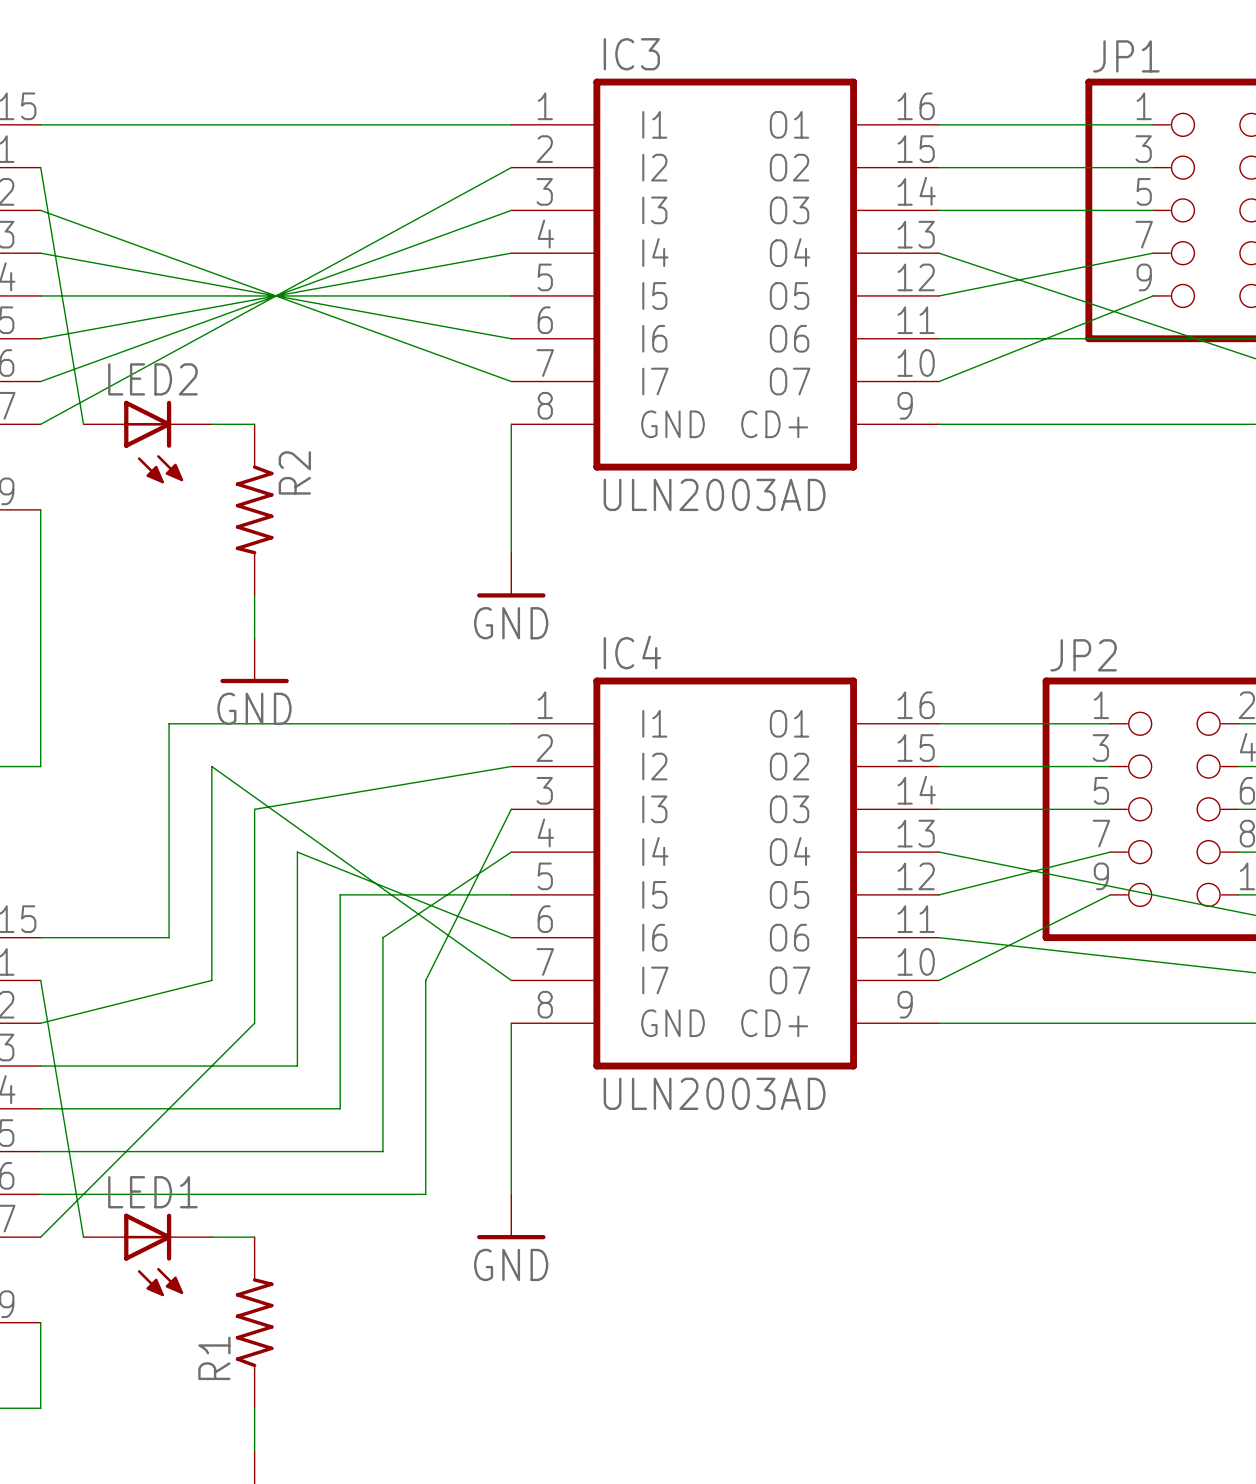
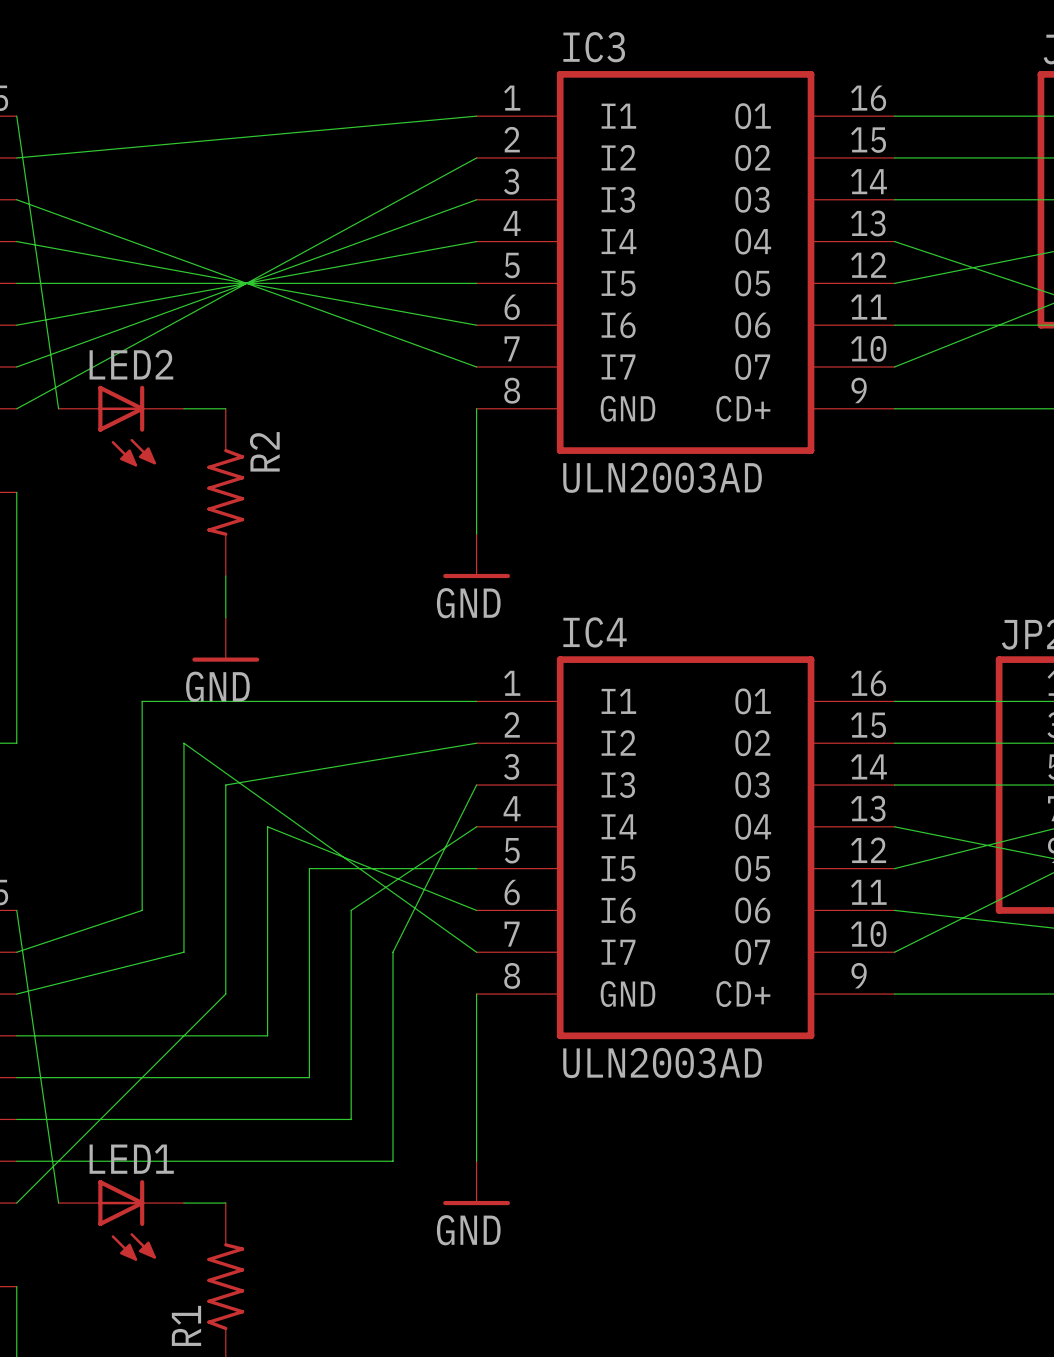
wire: (40, 124) (511, 124) -> (16, 157) (476, 116)
wire: (40, 167) (83, 424) -> (16, 116) (58, 408)
wire: (40, 937) (169, 937) -> (16, 952) (142, 910)
wire: (40, 980) (83, 1237) -> (16, 910) (58, 1203)

